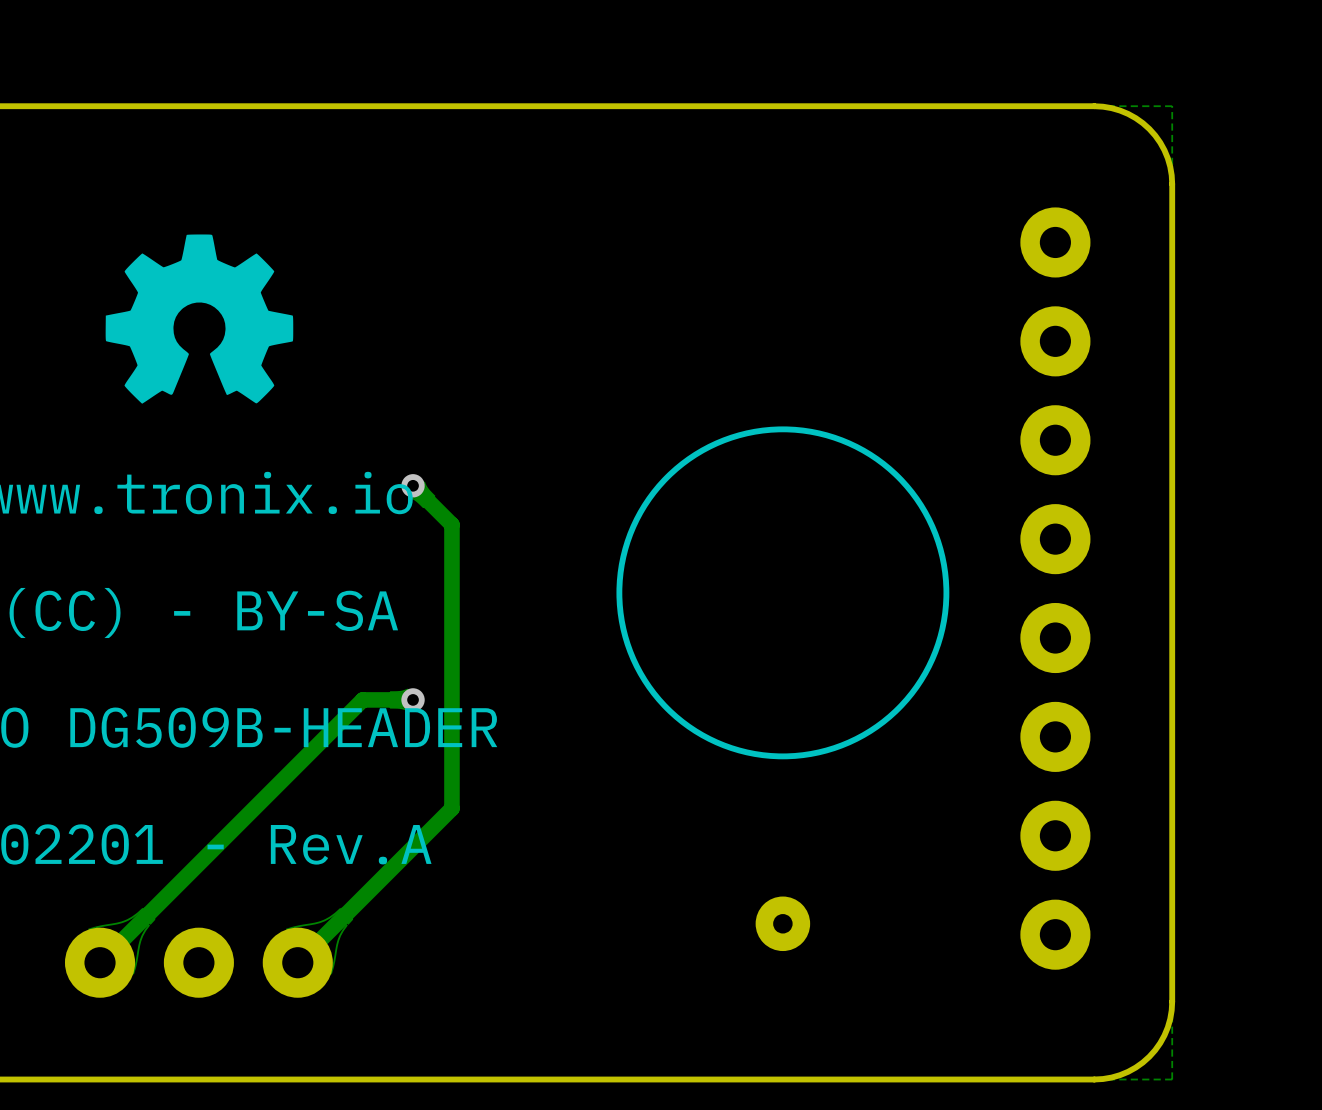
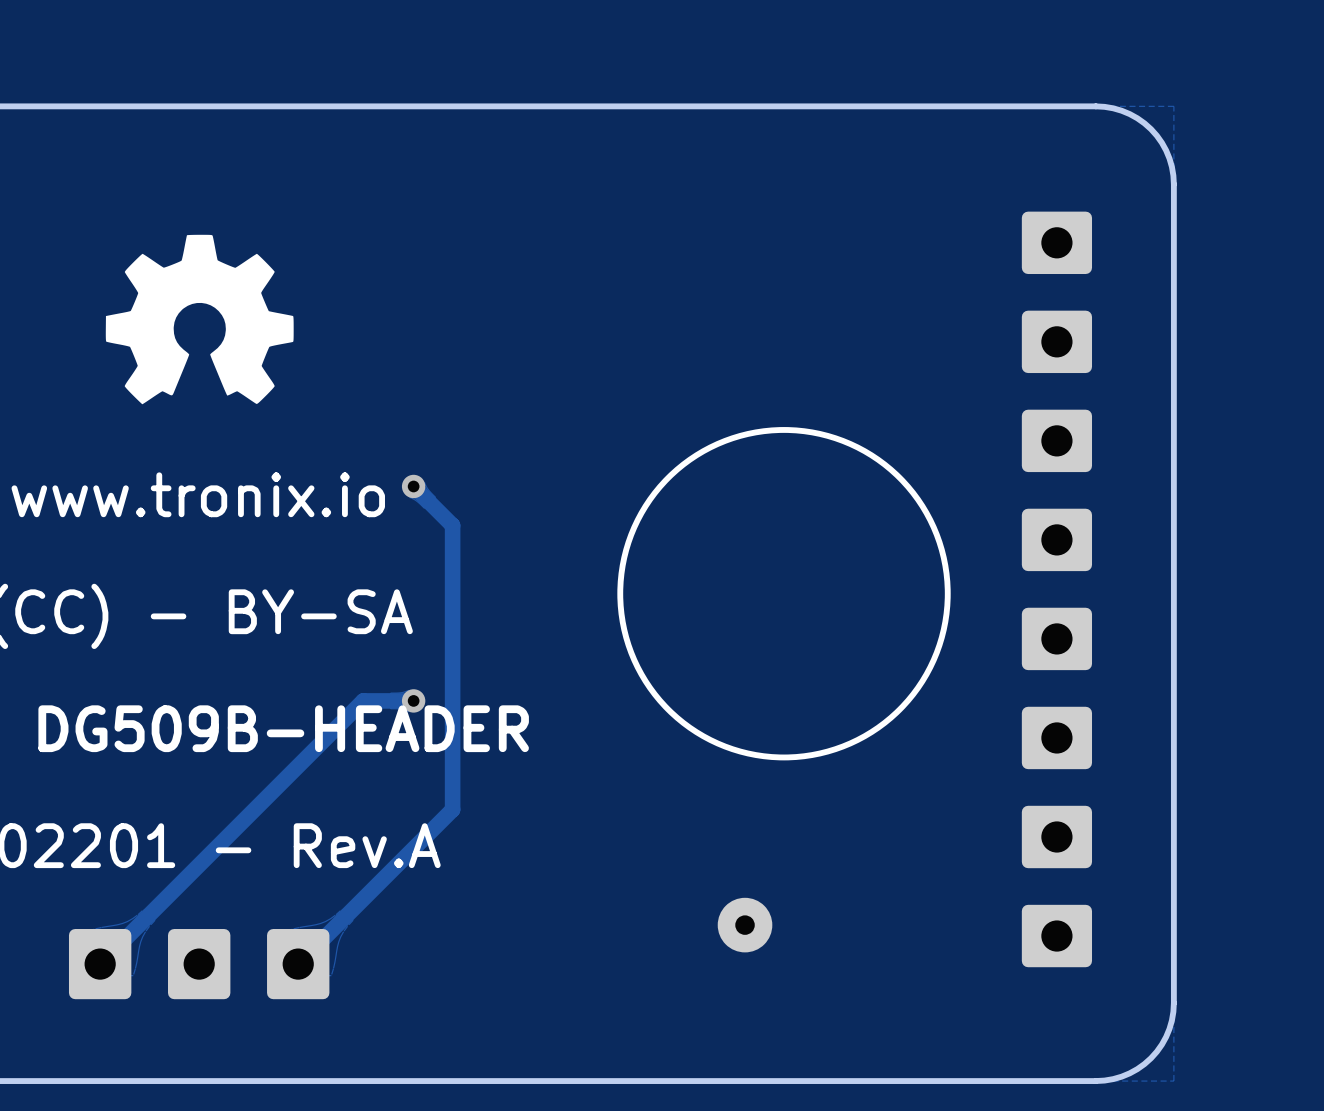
part footprint: [1020, 207, 1091, 970] -> [1021, 211, 1093, 968]
part position: (782, 923) -> (745, 925)
part footprint: [64, 927, 333, 998] -> [68, 929, 330, 1000]

